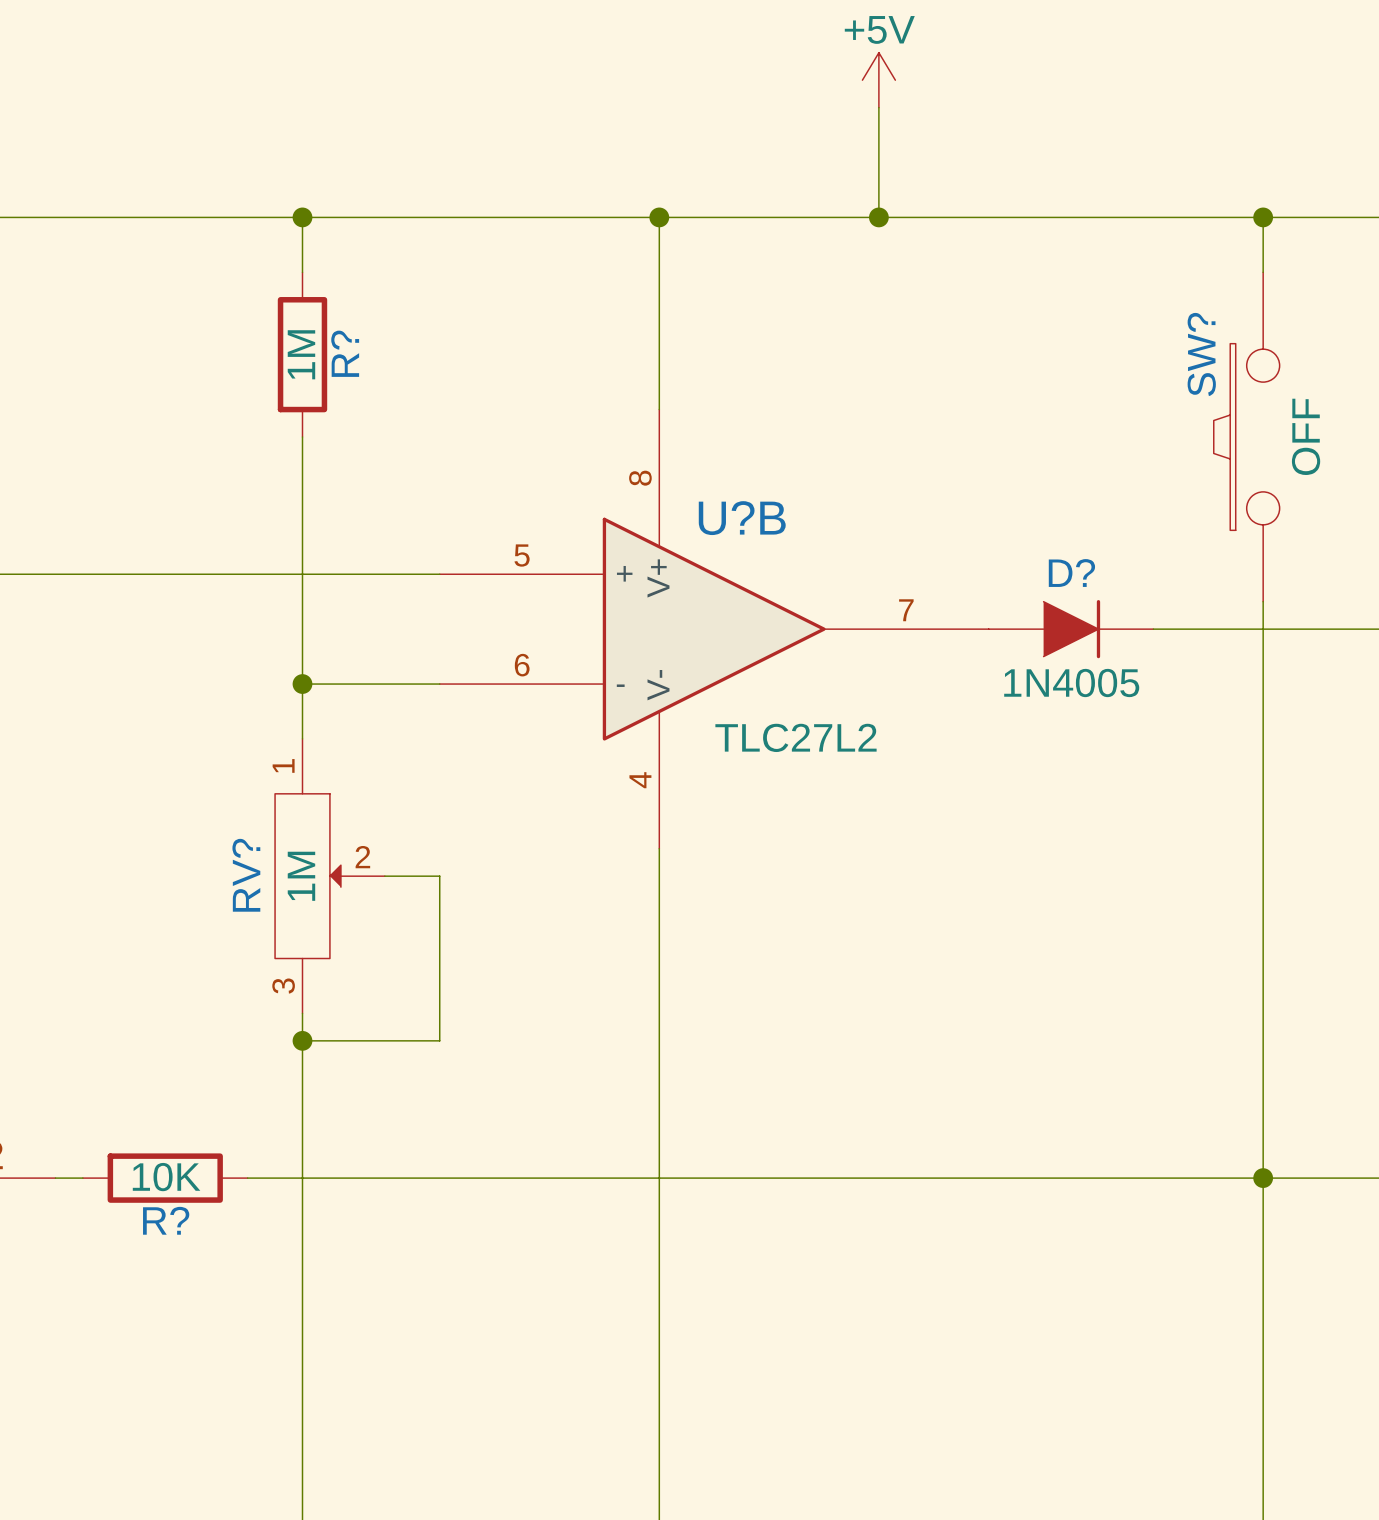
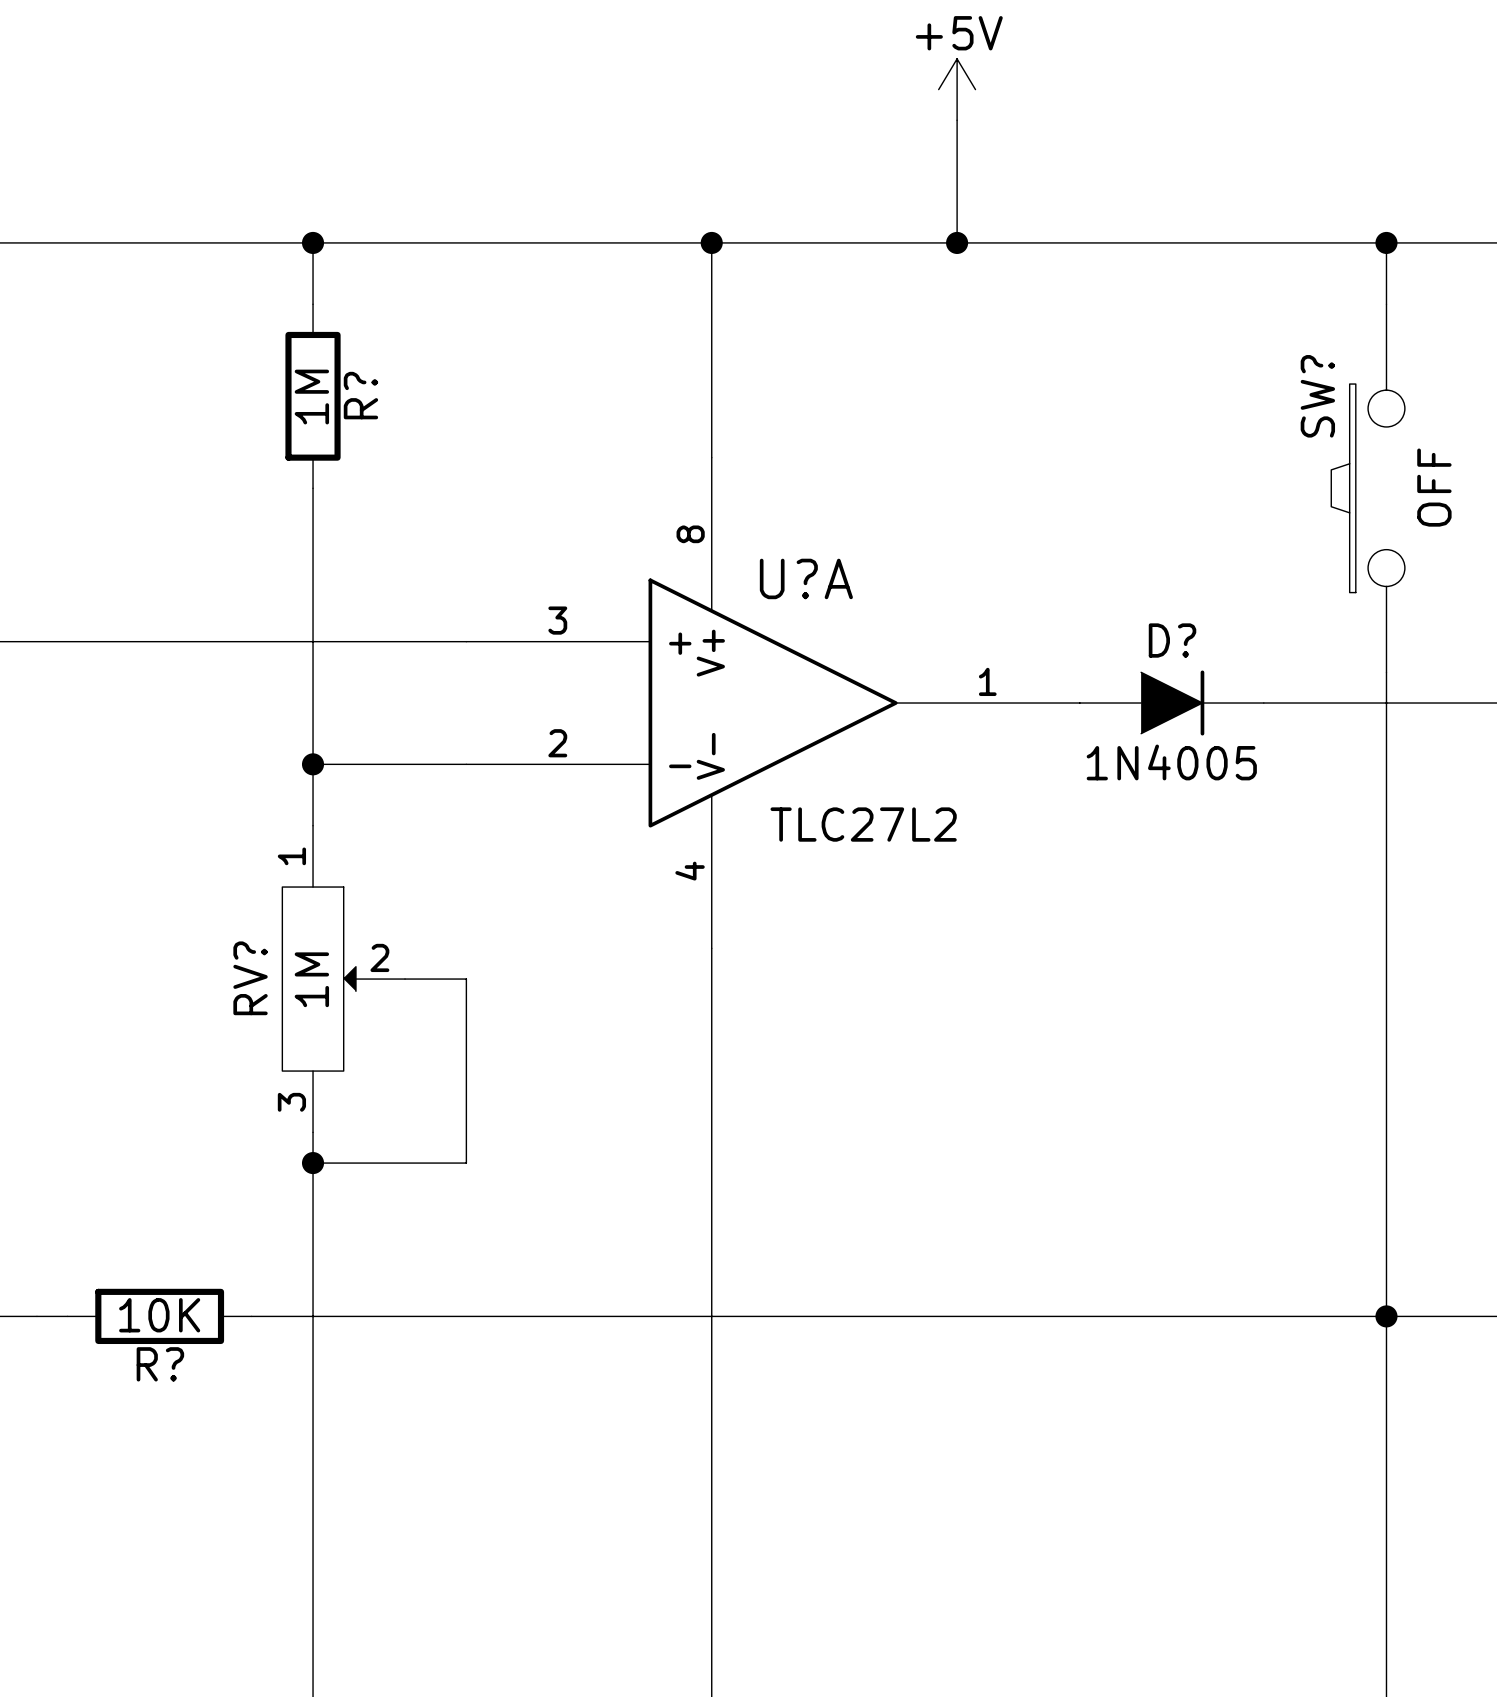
U?B name: U?B (742, 518) -> U?A (806, 578)
U?B pin number: 5 (522, 555) -> 3 (557, 620)
U?B pin number: 7 (906, 610) -> 1 (987, 681)
U?B pin number: 6 (522, 665) -> 2 (557, 743)

